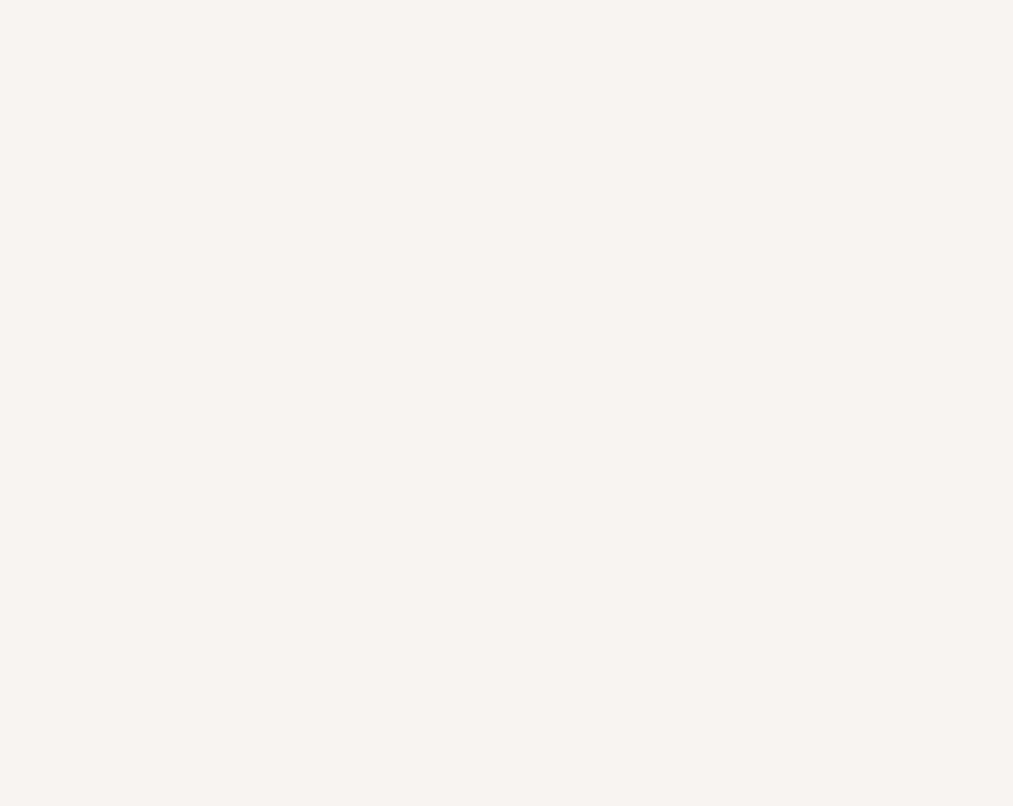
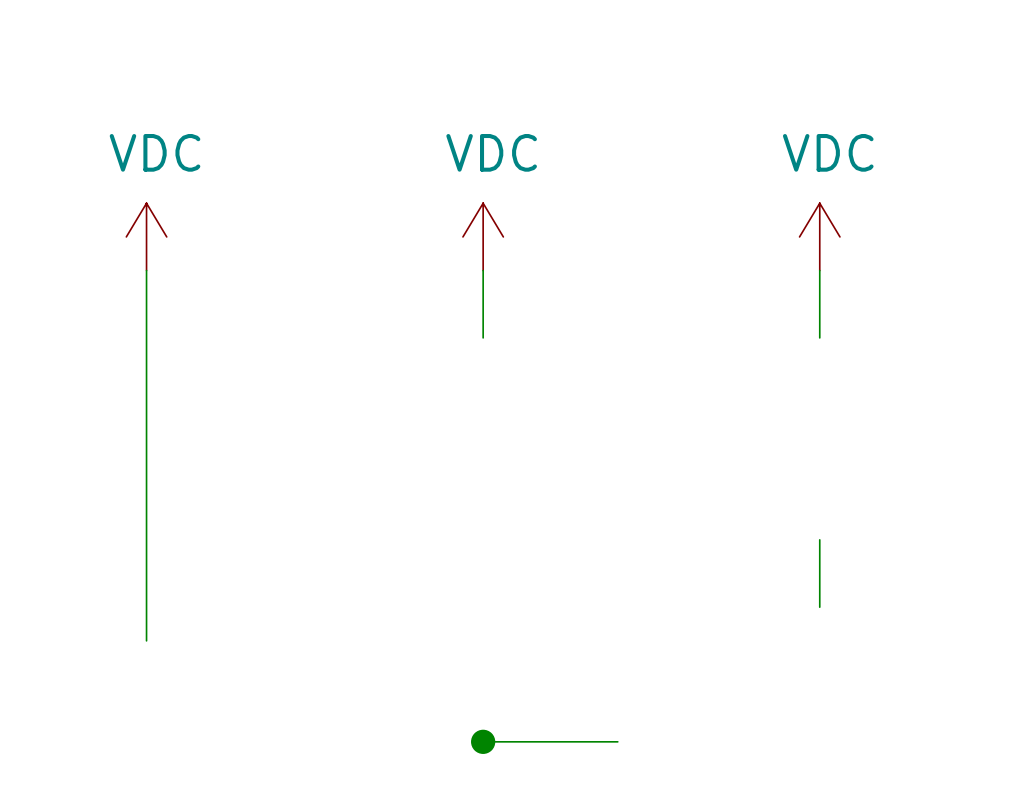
power symbol: none -> VDC (146, 236)
power symbol: none -> VDC (483, 236)
power symbol: none -> VDC (819, 236)
wire: none -> (146, 270) (146, 640)
wire: none -> (483, 270) (483, 337)
wire: none -> (819, 270) (819, 337)
wire: none -> (819, 539) (819, 607)
wire: none -> (483, 741) (617, 741)
junction: none -> (483, 741)

